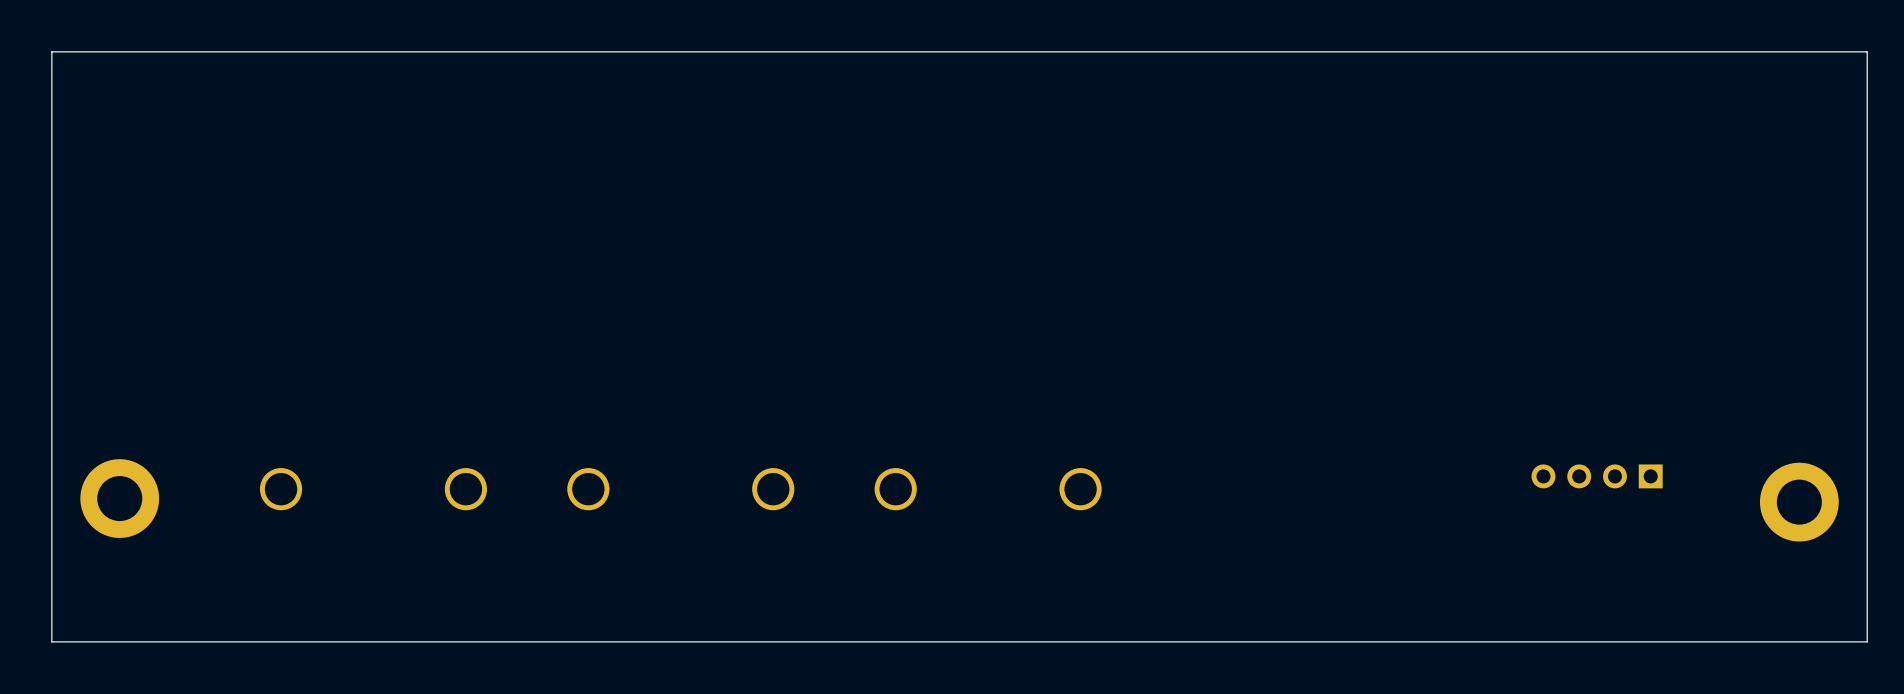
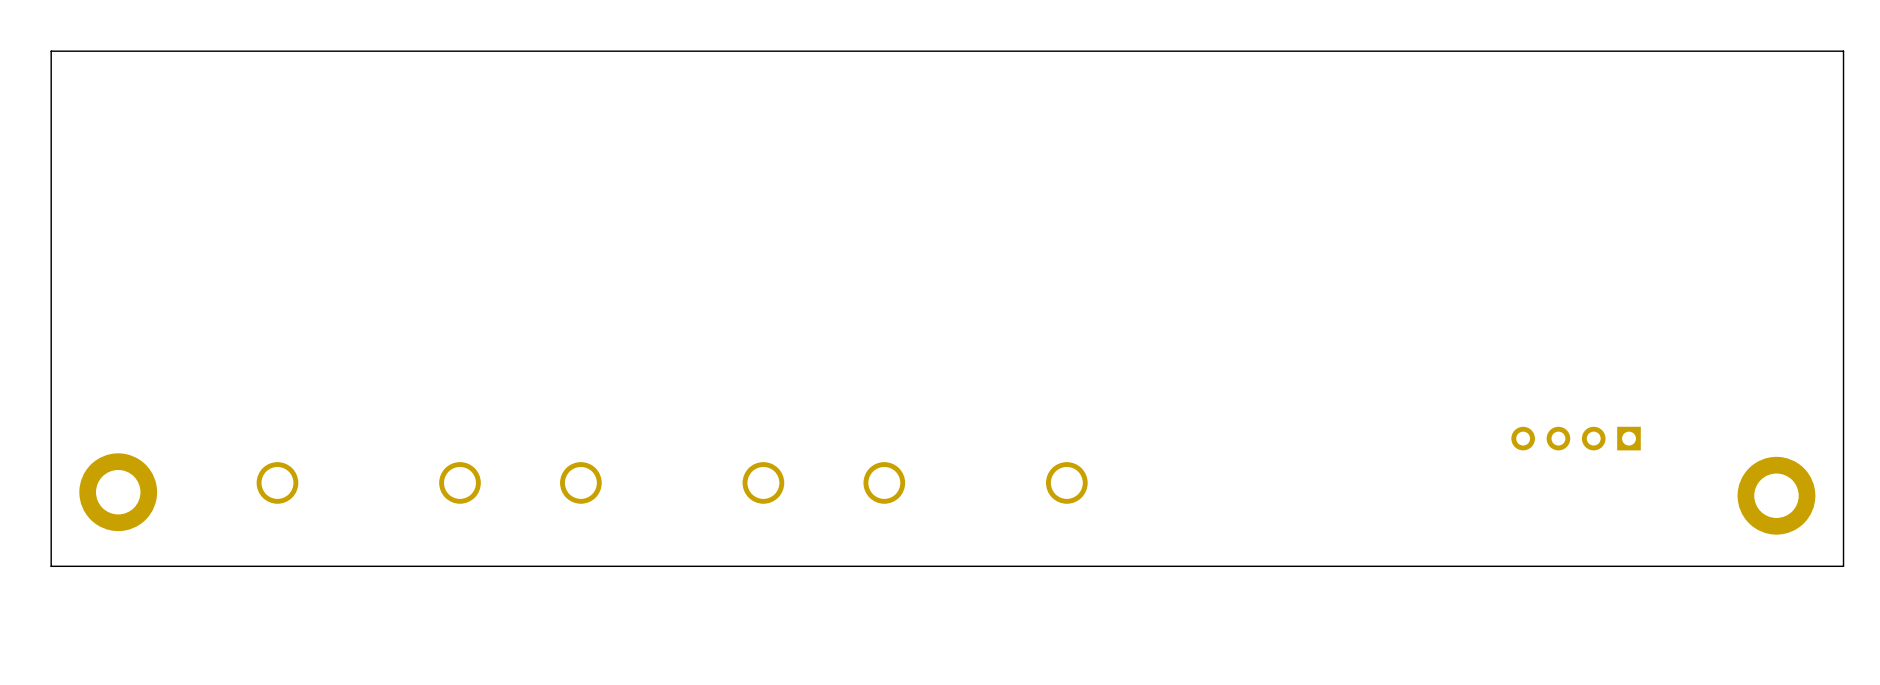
part position: (1597, 476) -> (1576, 438)
board edge: (1867, 573) (1867, 641) (51, 641) (51, 573) -> (1843, 566) (51, 566)

